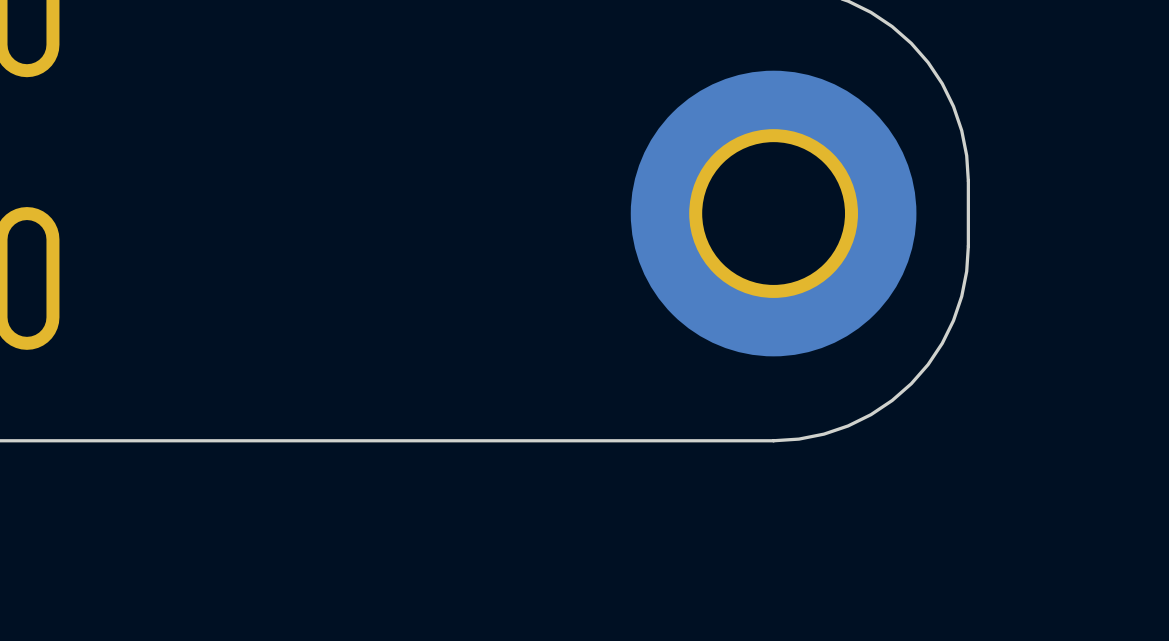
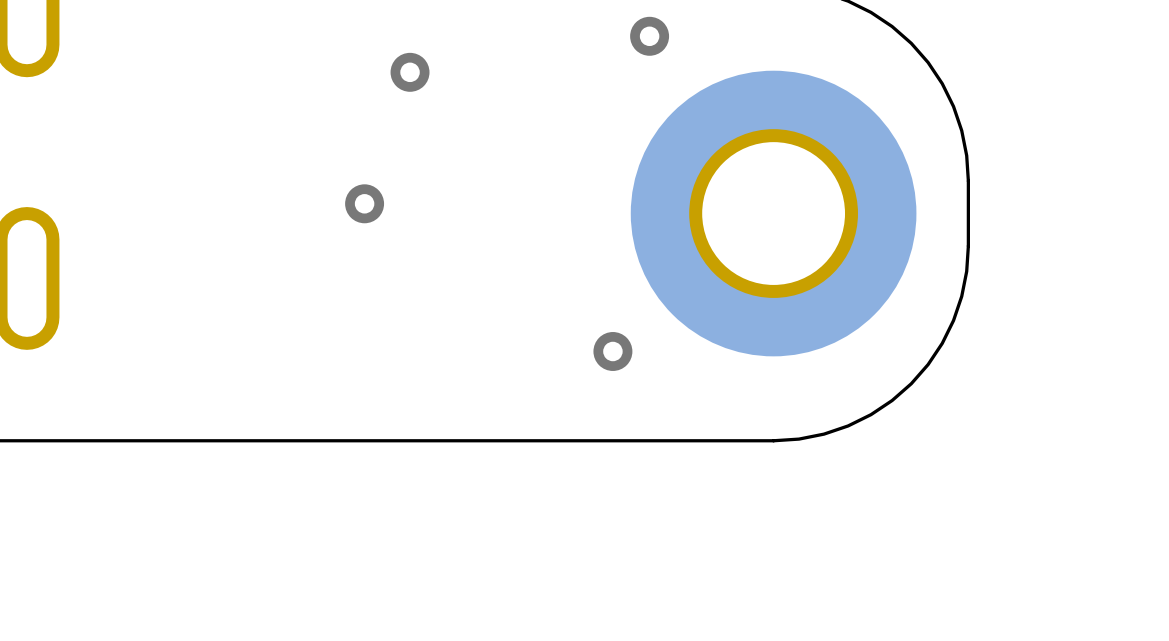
via: none -> (649, 36)
via: none -> (410, 72)
via: none -> (364, 203)
via: none -> (612, 351)

